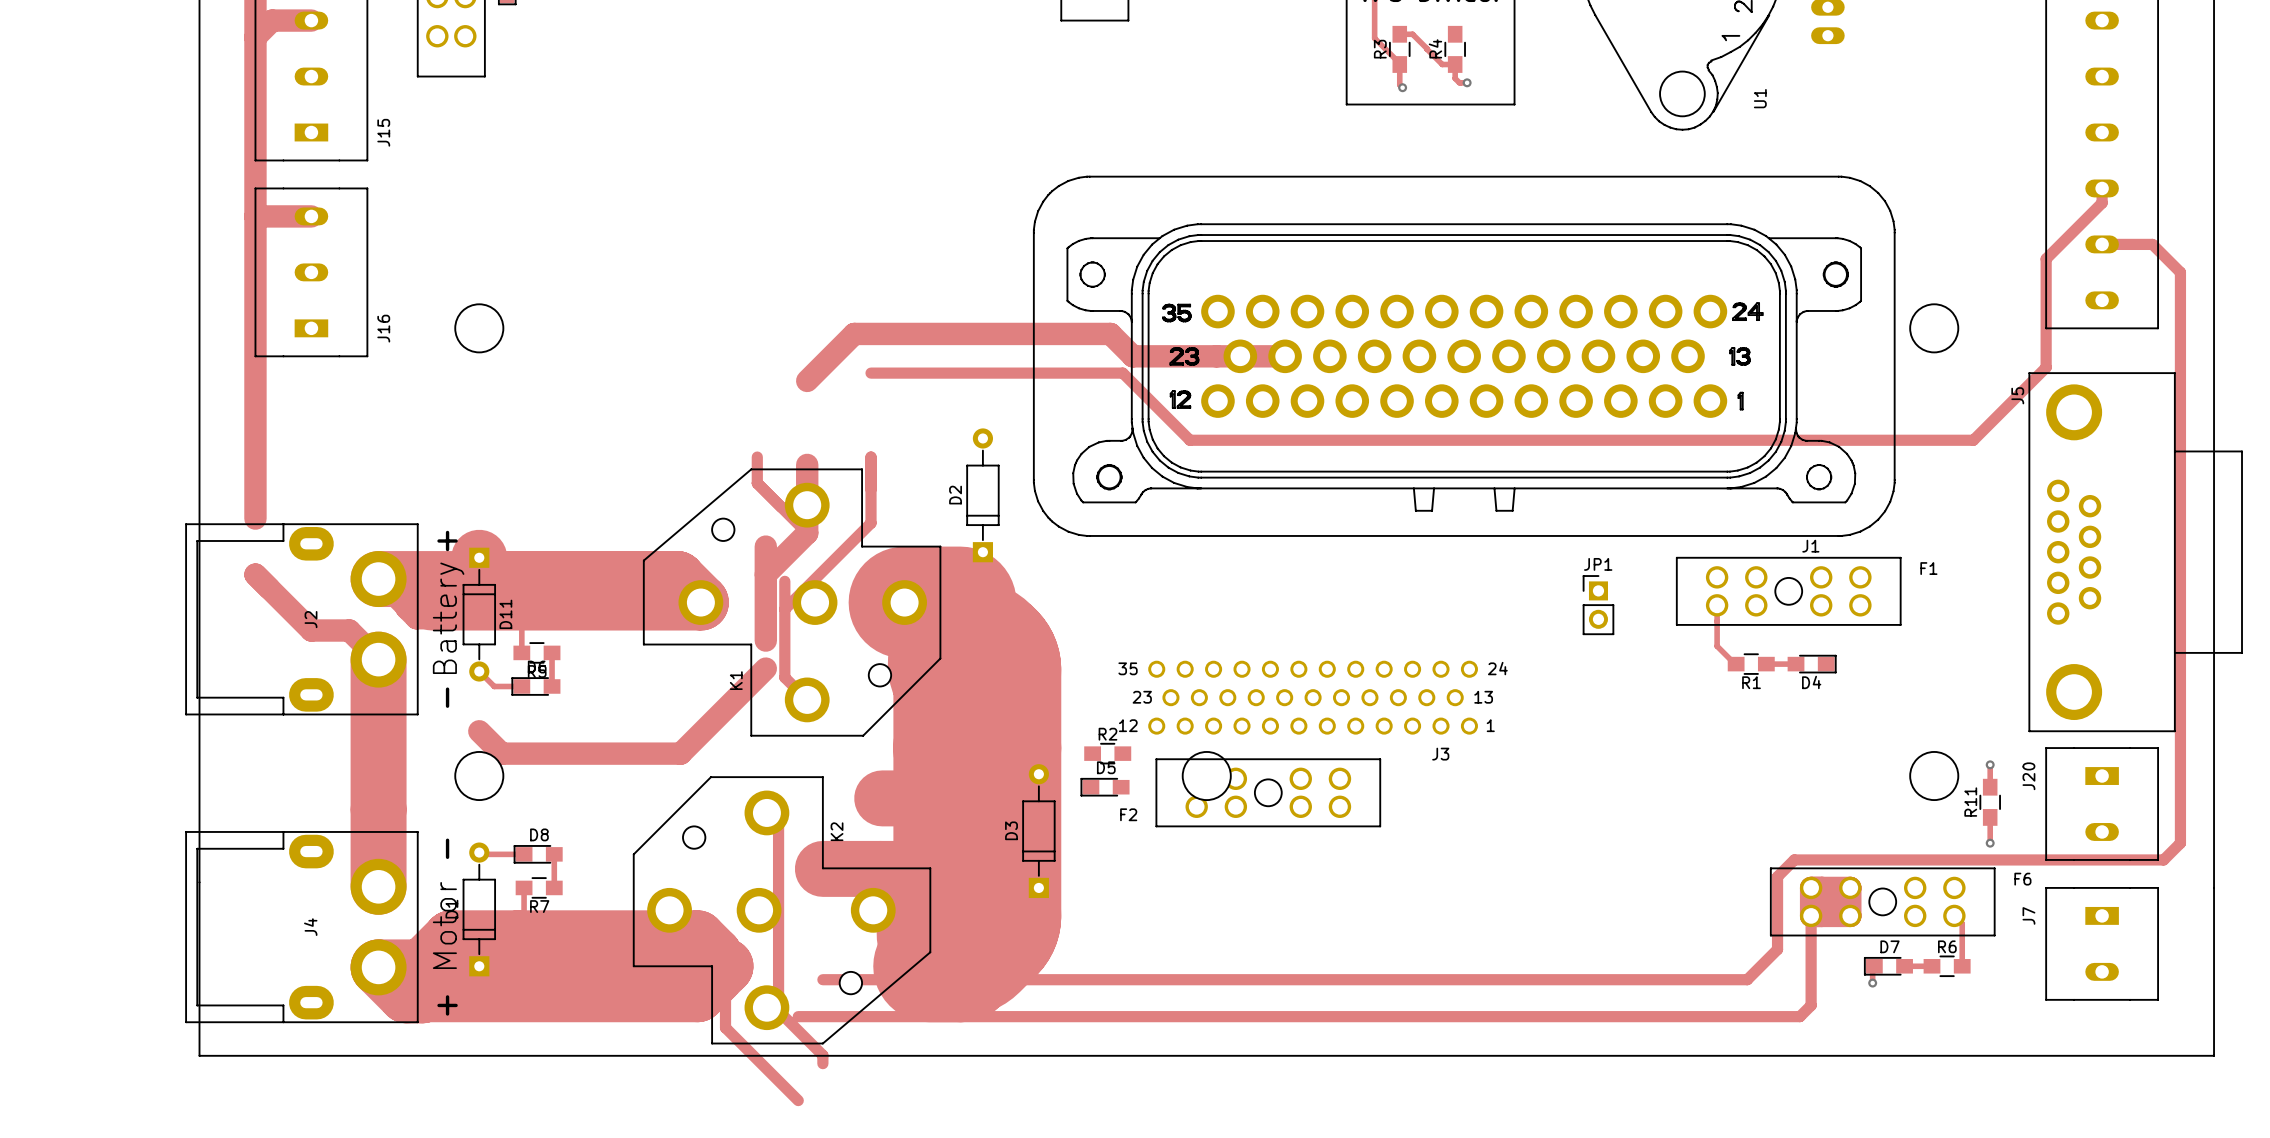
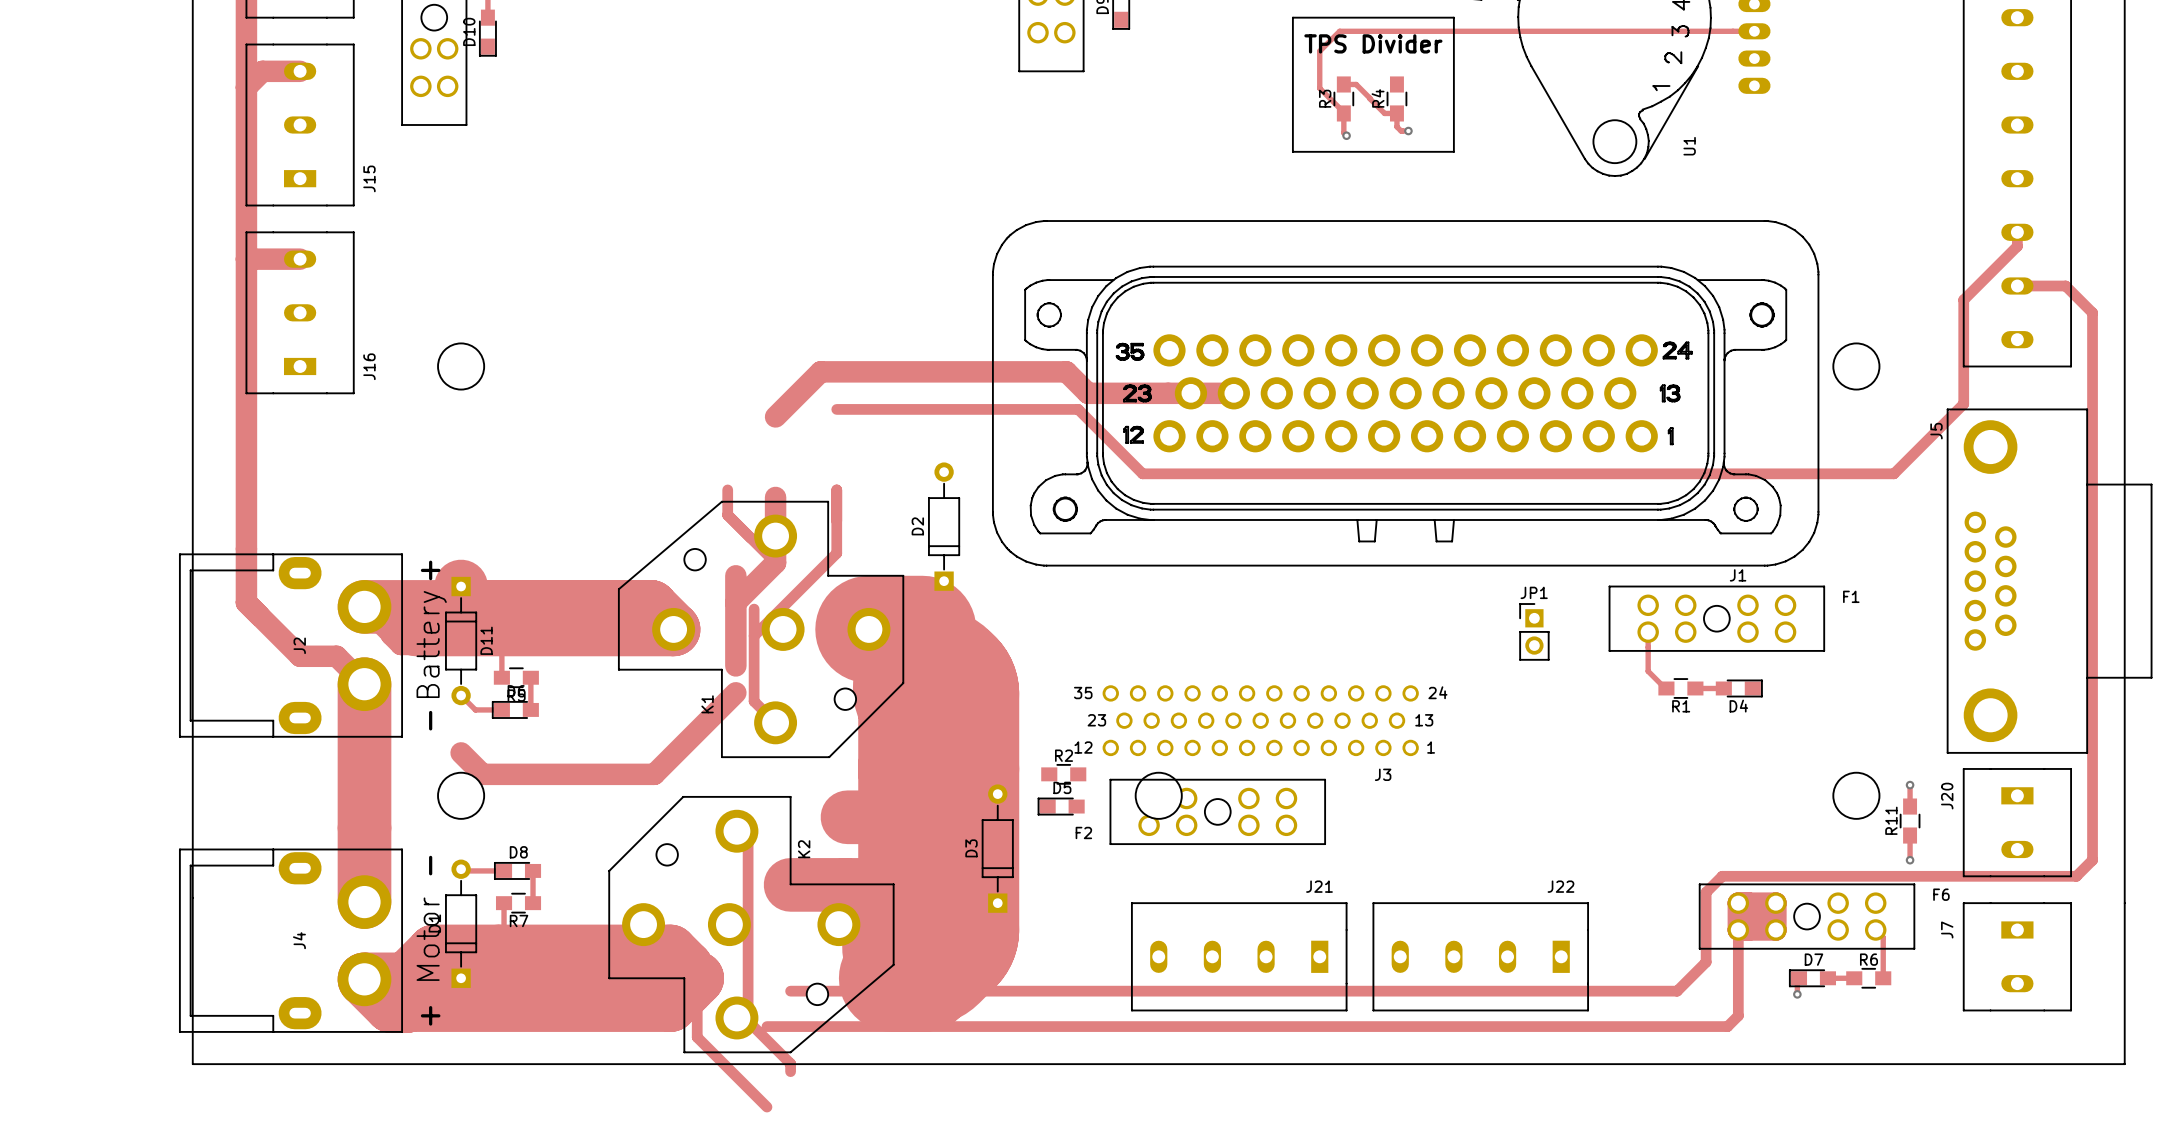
track: none -> (246, 548) (246, 602)
J21: none -> (1239, 956)
J22: none -> (1480, 956)

